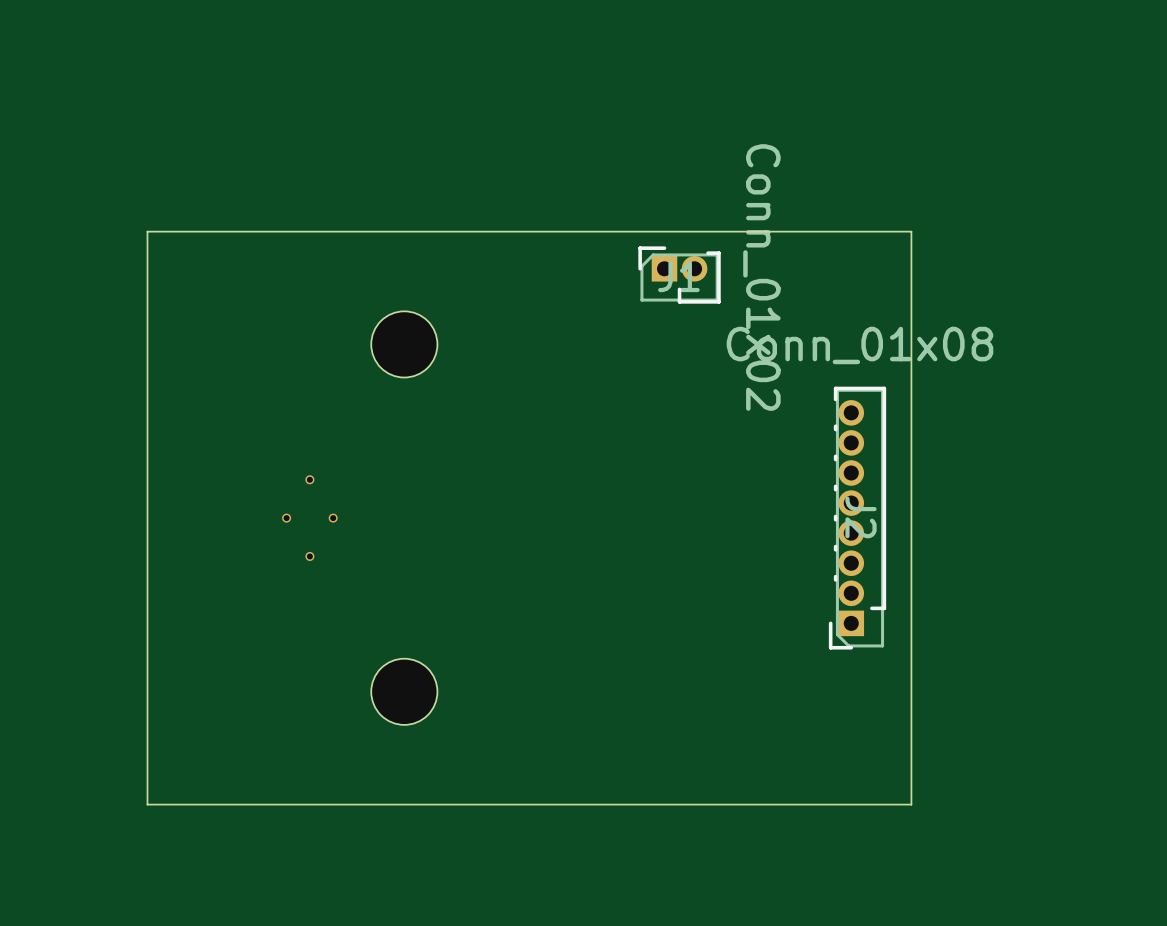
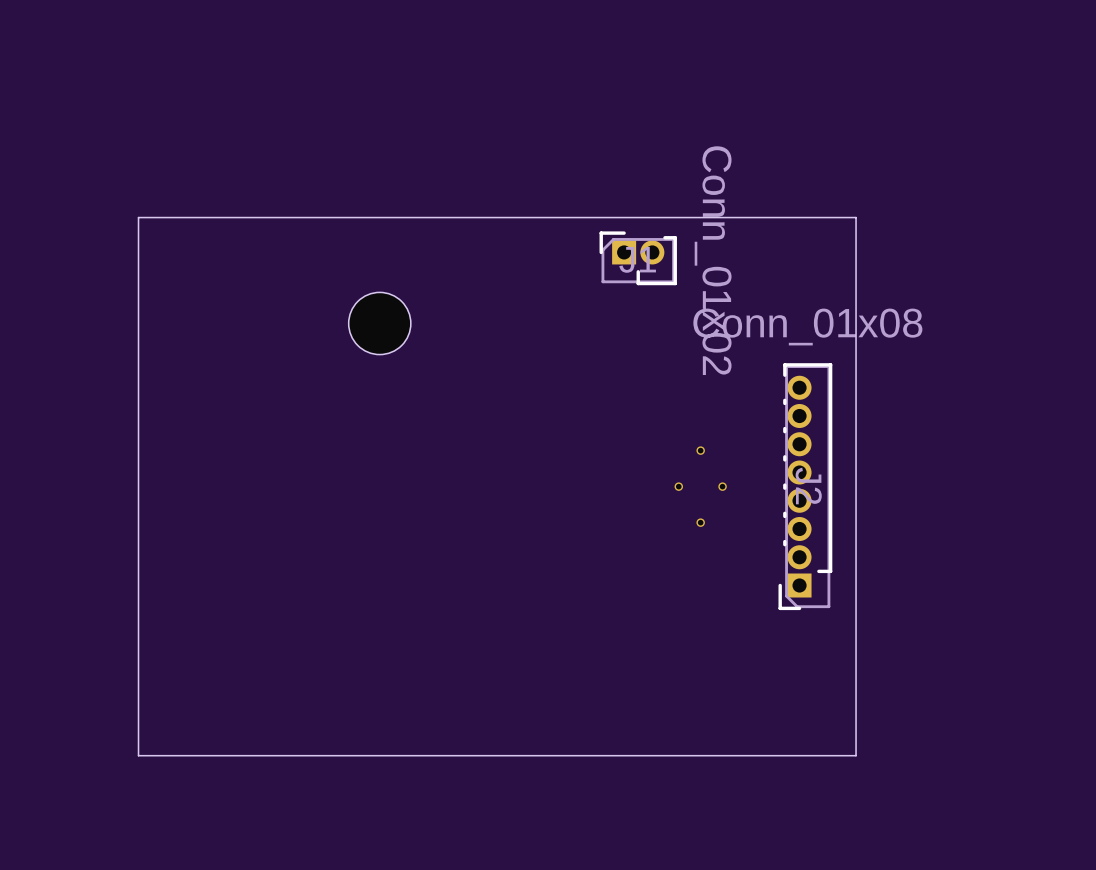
part position: (309, 518) -> (700, 486)
part: (404, 691) -> none

